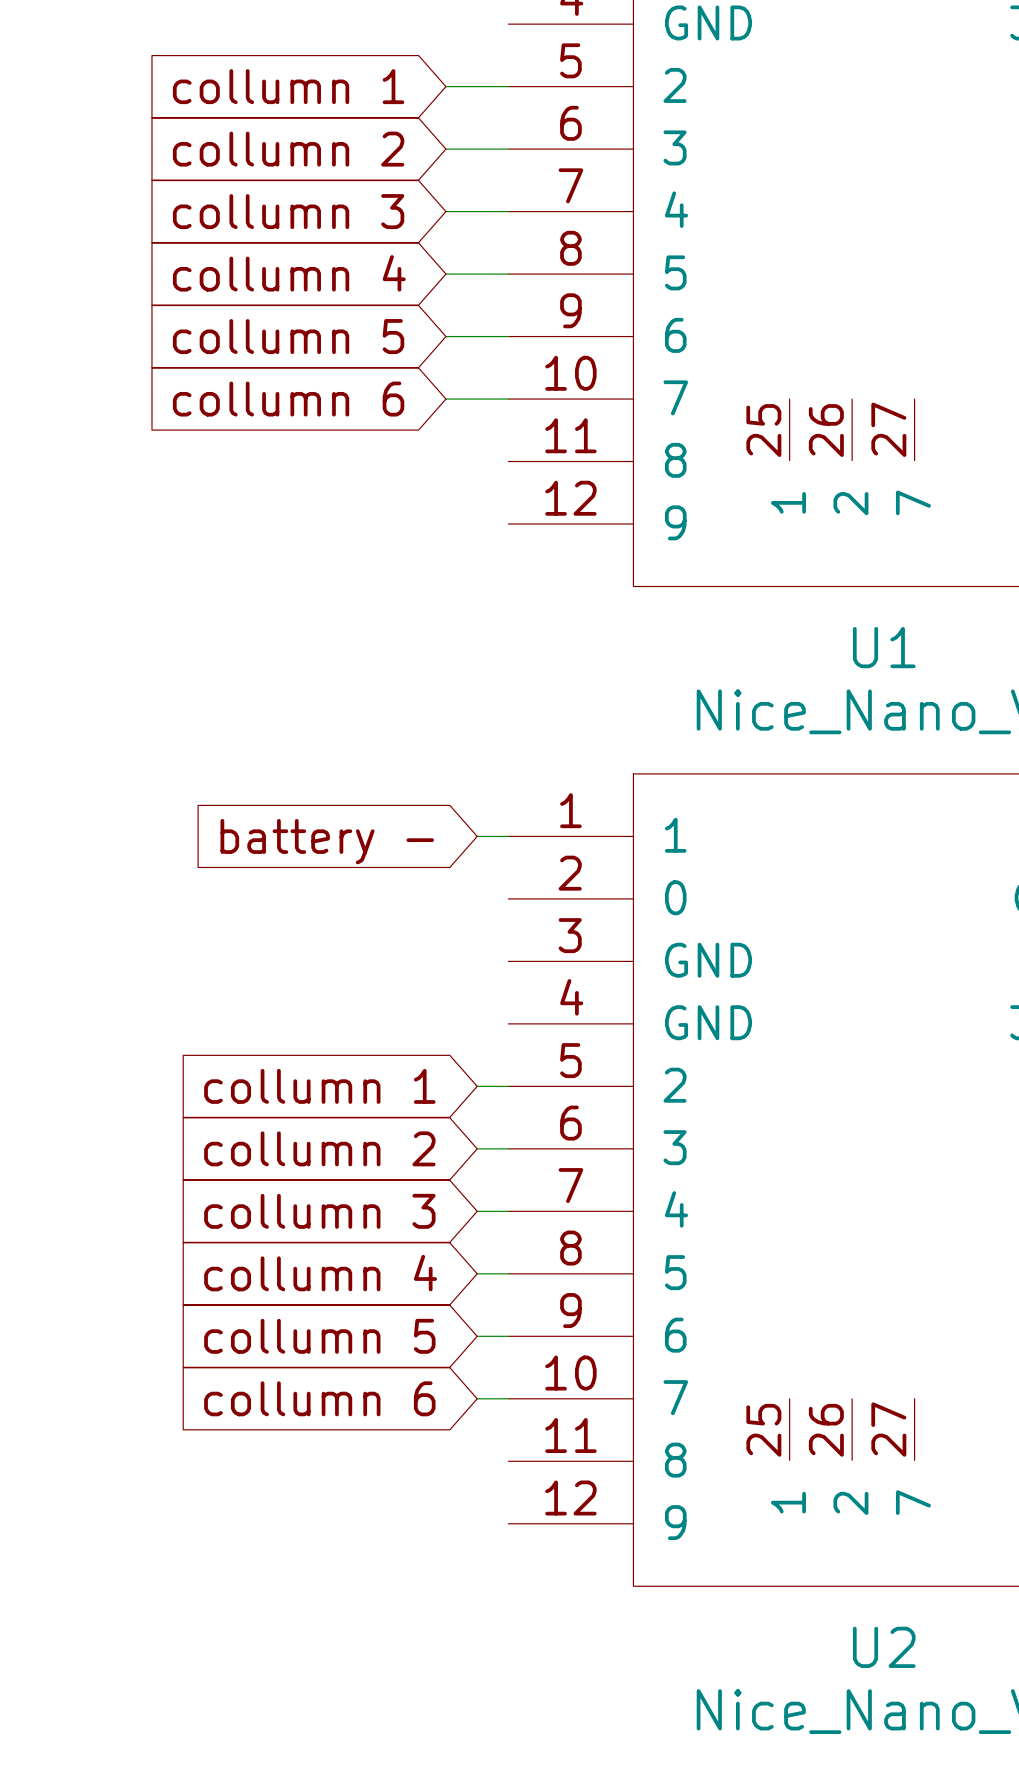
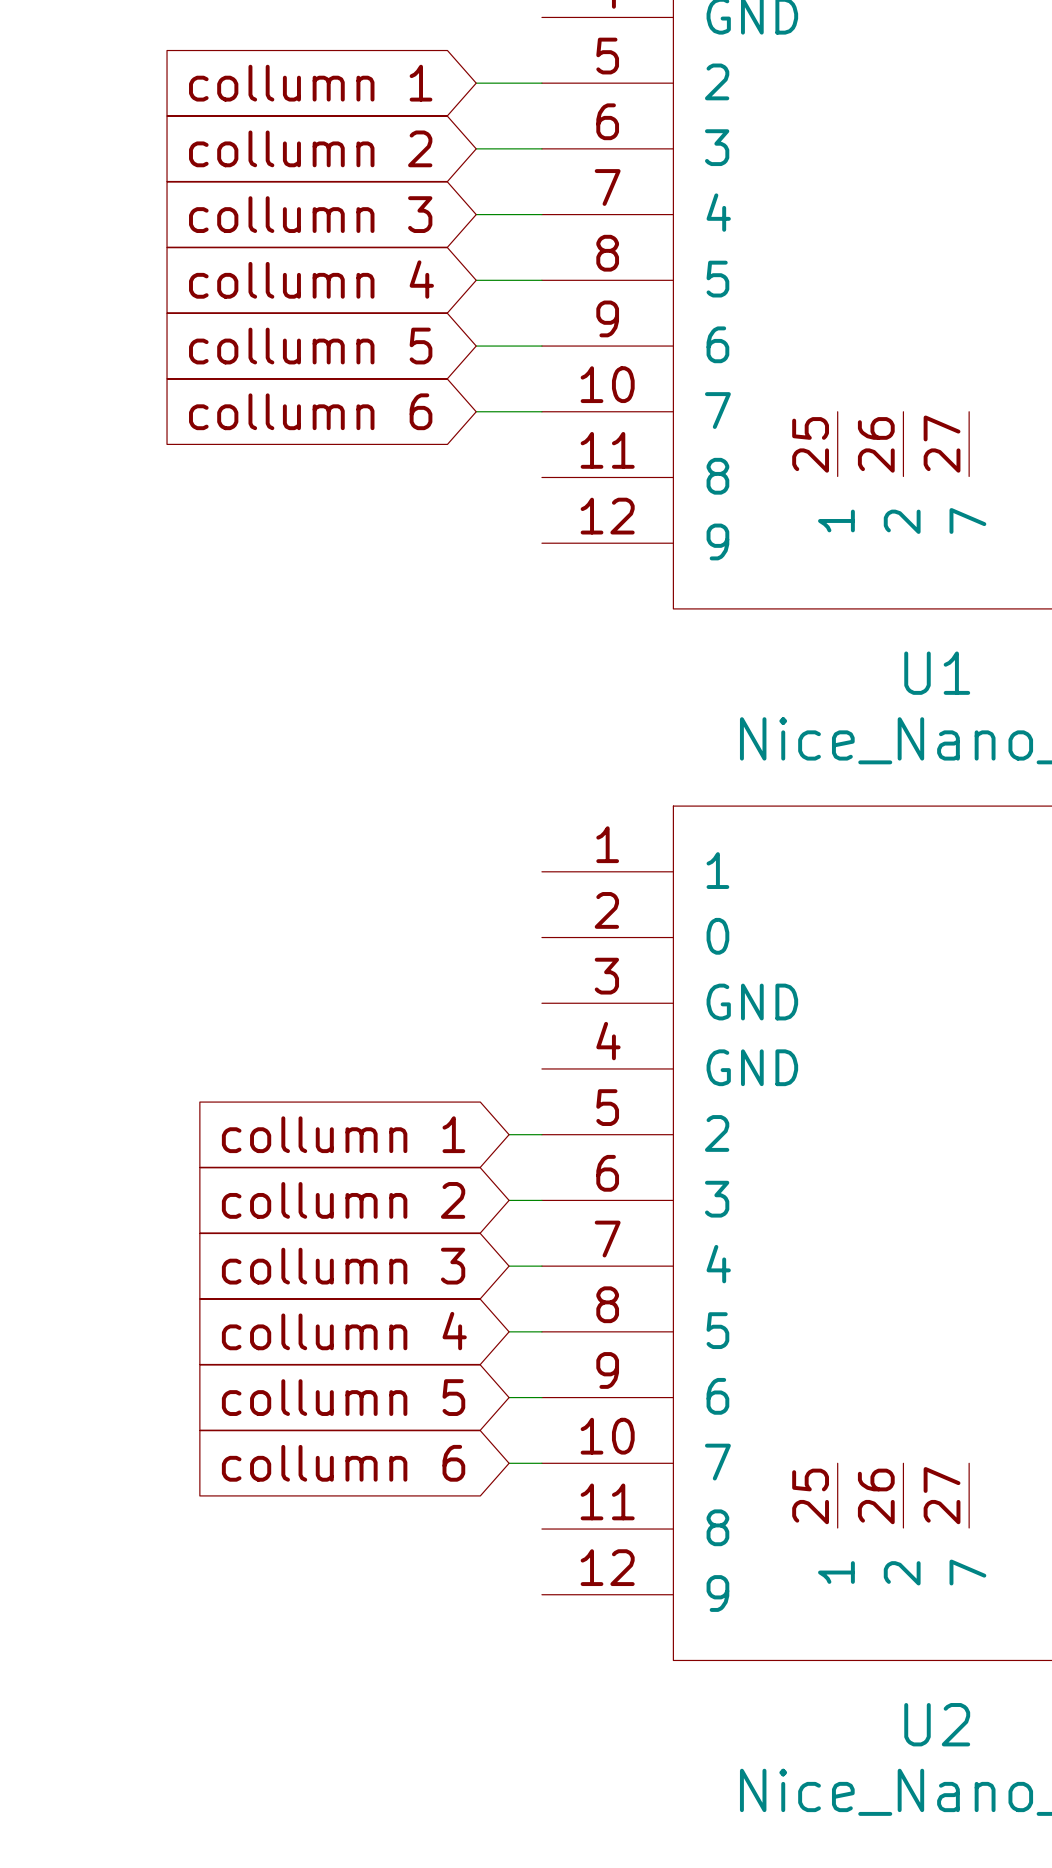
wire: (477, 836) (508, 836) -> none
global label: battery - (327, 841) -> none

